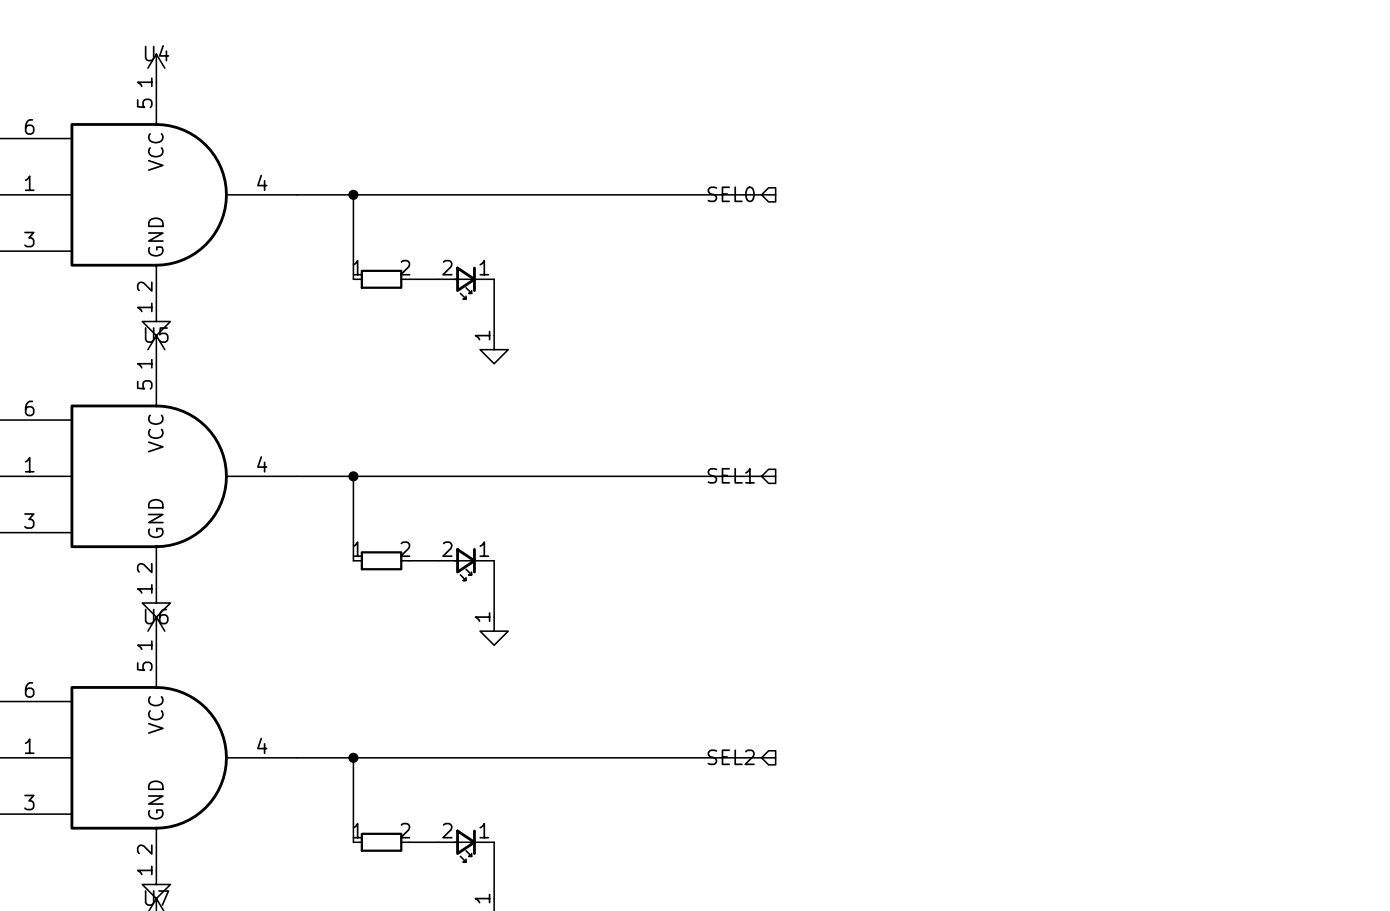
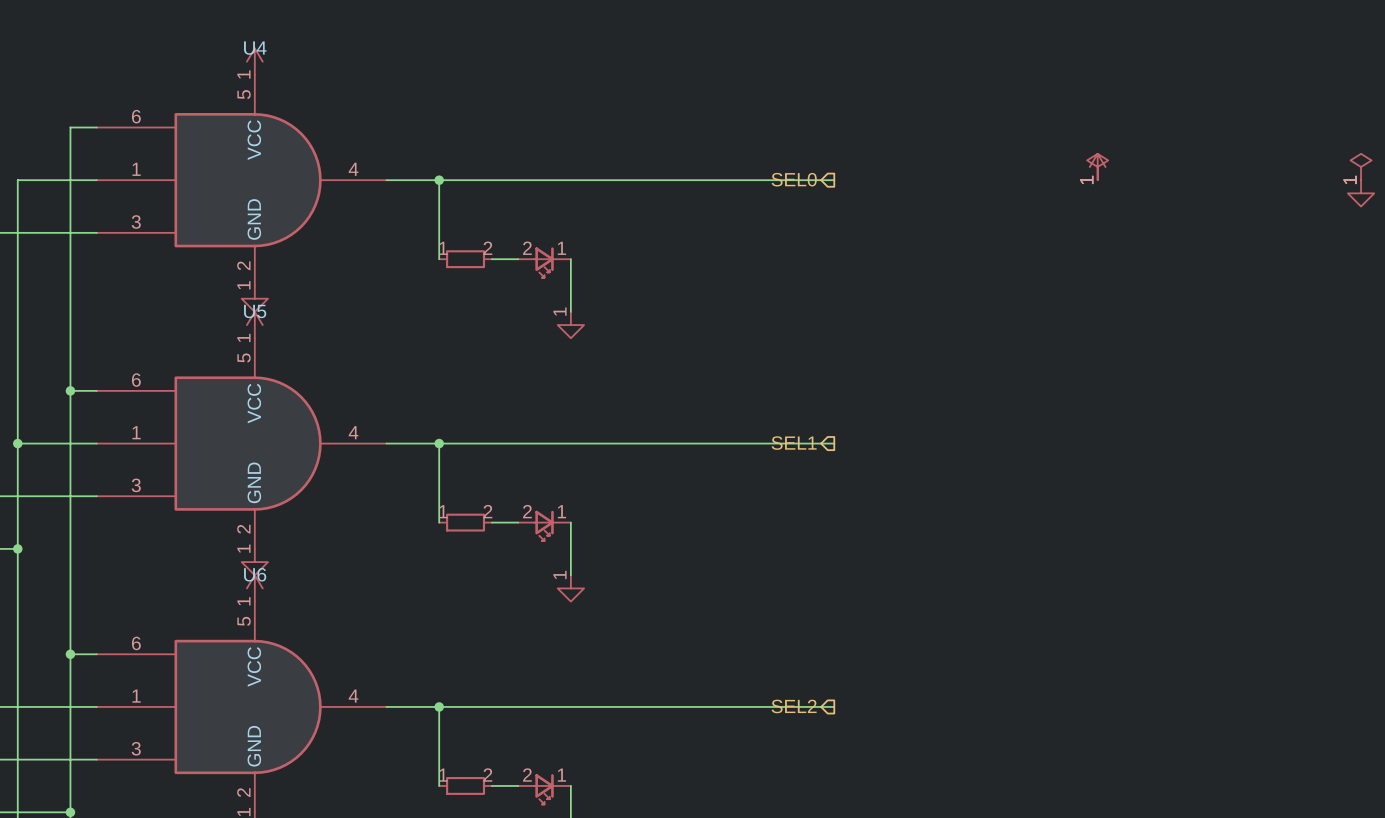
power symbol: none -> (1097, 167)
power symbol: none -> (1097, 167)
power symbol: none -> (1361, 167)
power symbol: none -> (1361, 193)

